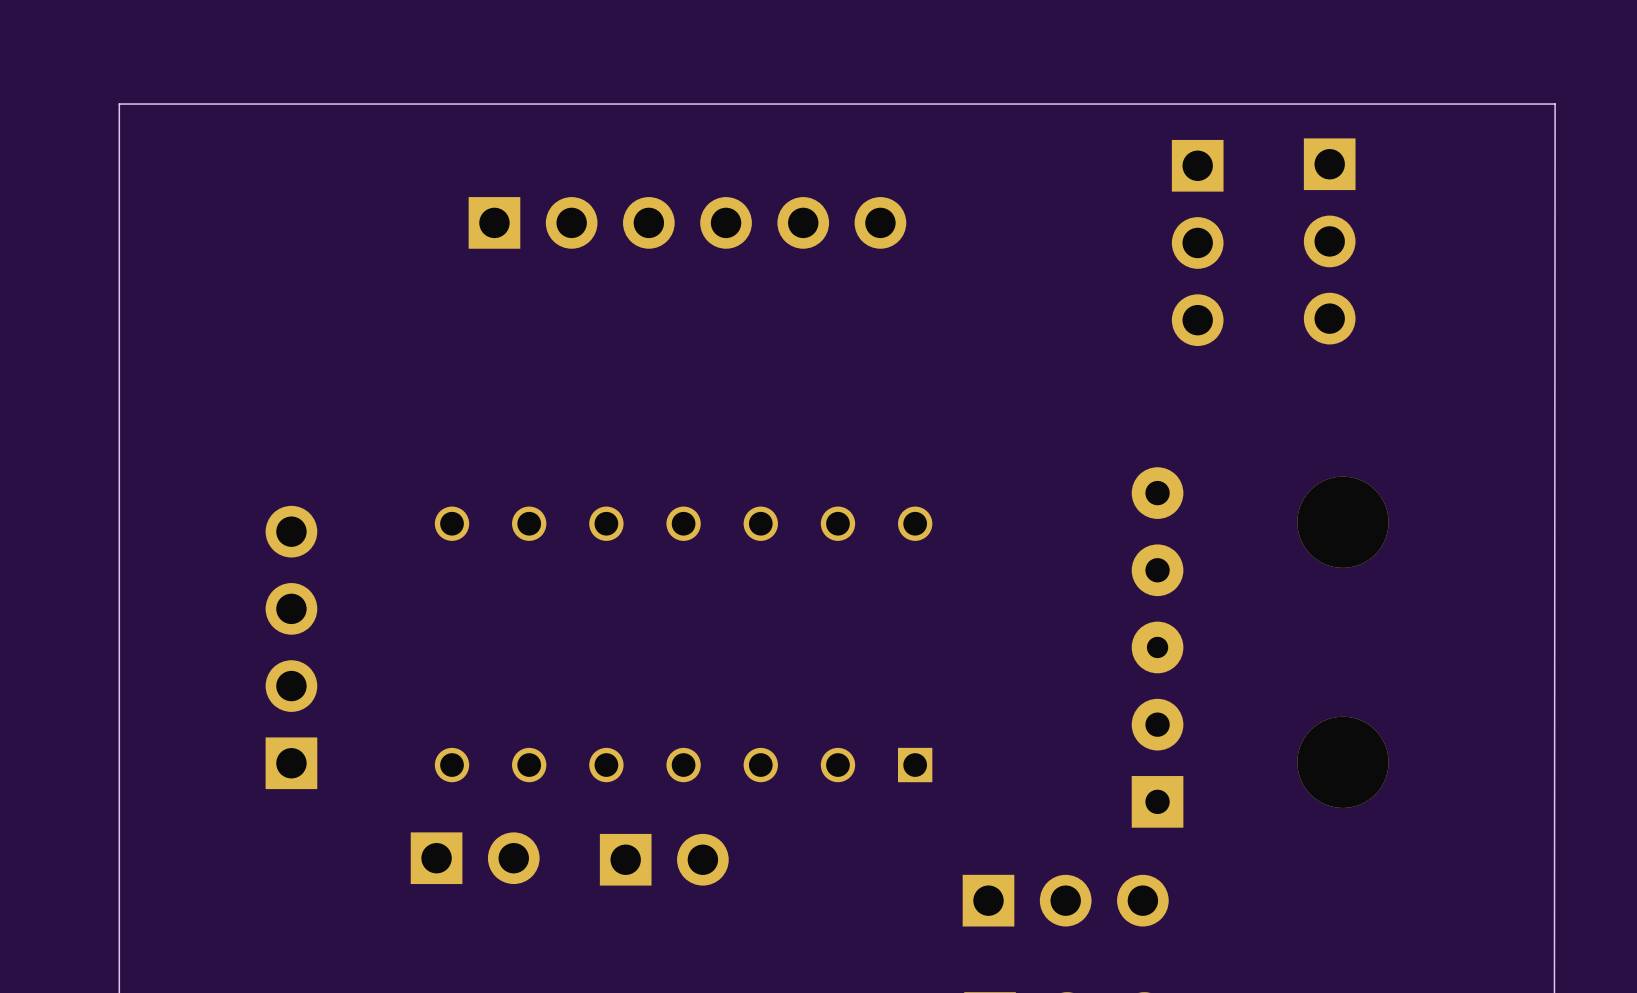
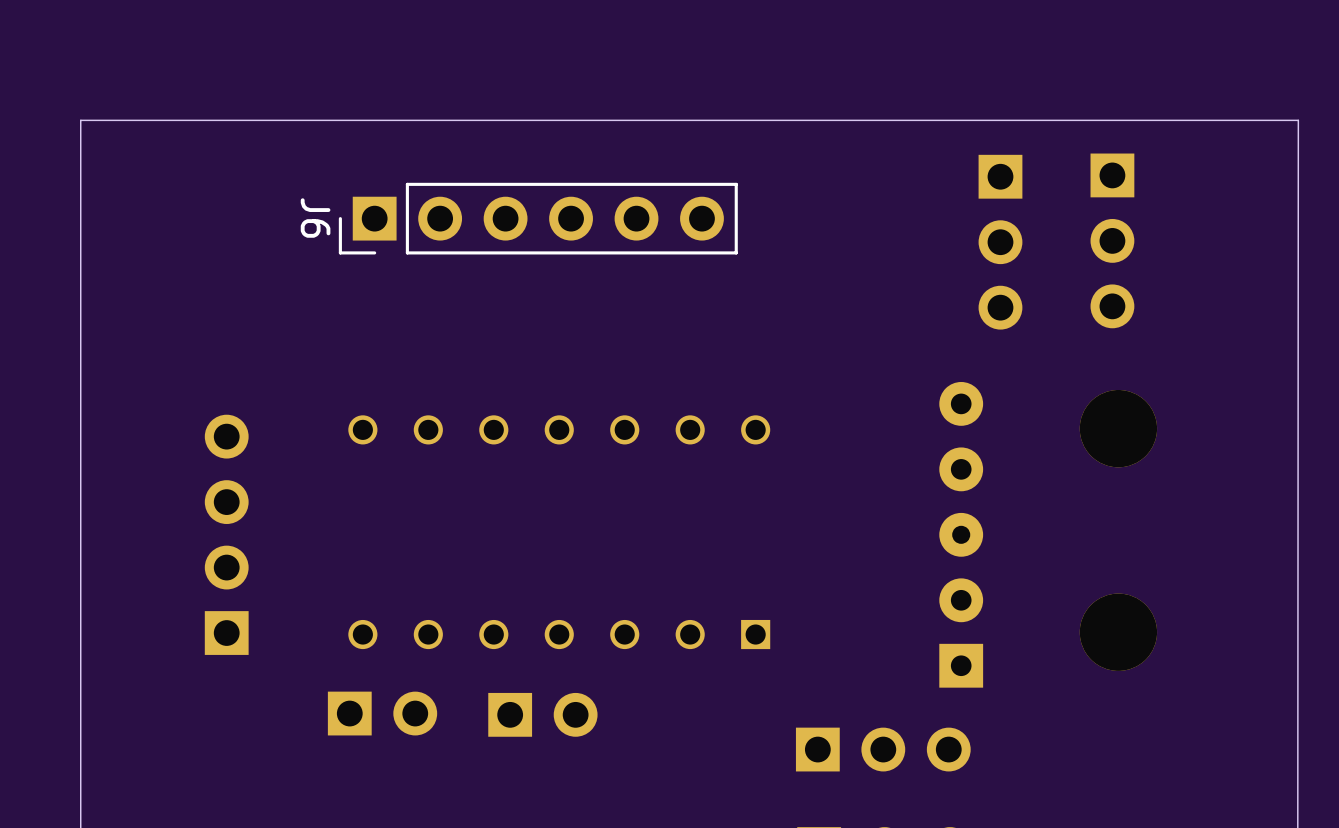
board edge: (1555, 158) (1555, 104) (119, 104) (119, 158) -> (1298, 120) (80, 120)
J6 side: top (687, 222) -> bottom (538, 218)
part position: (1329, 241) -> (1112, 240)
part position: (1197, 242) -> (1000, 242)

